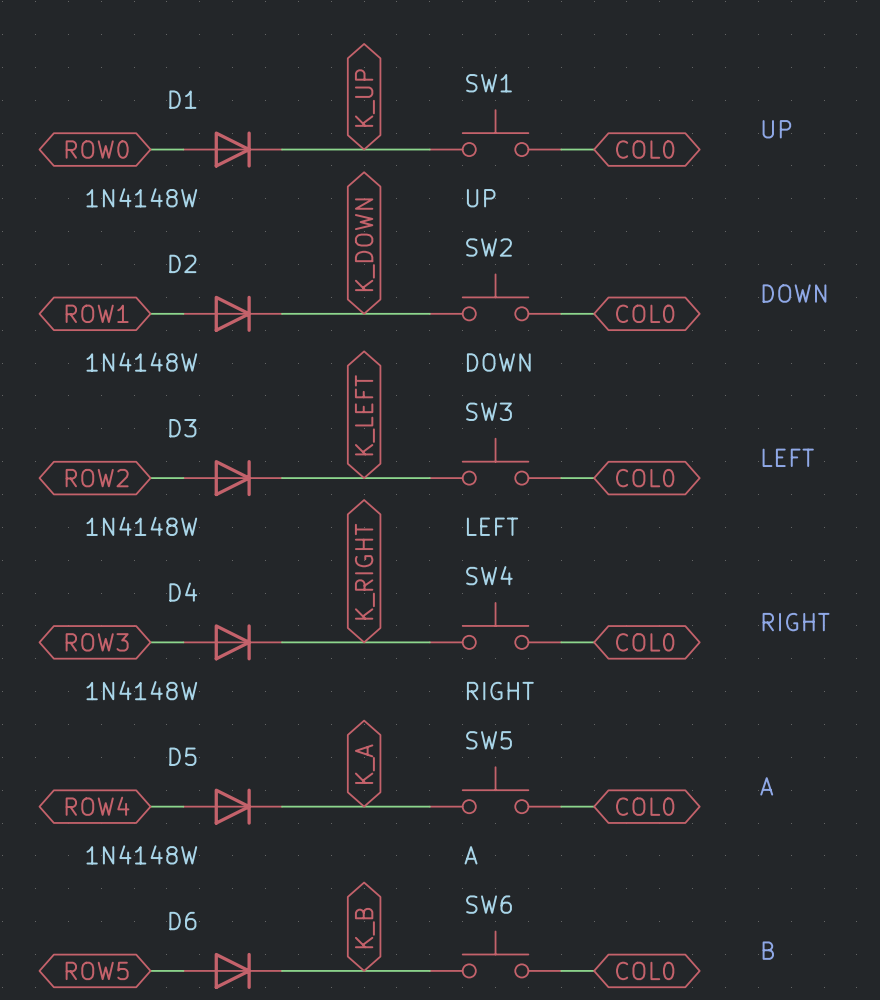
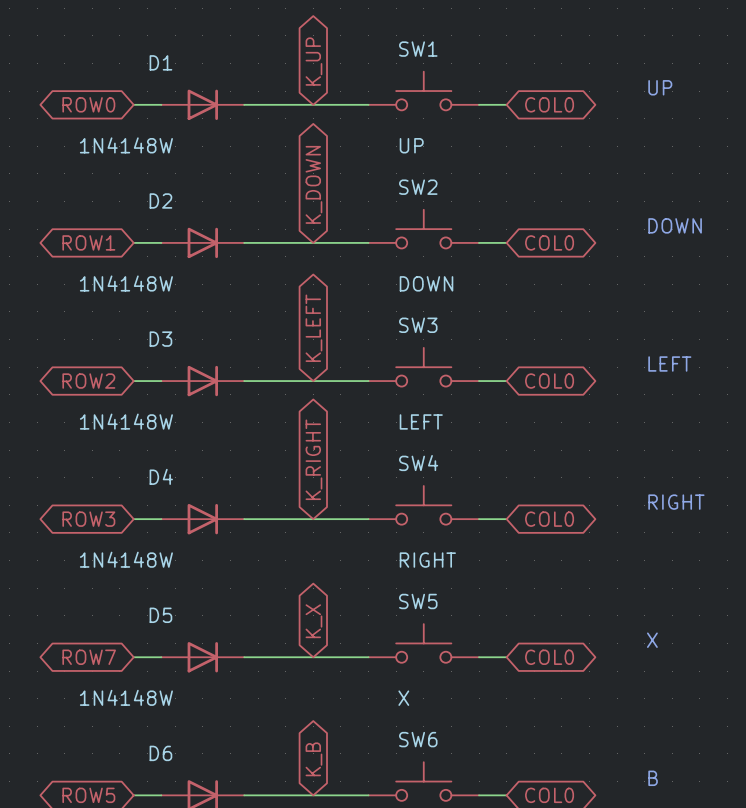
global label: K_A (364, 764) -> K_X (313, 621)
text: A (766, 786) -> X (652, 640)
global label: ROW4 (97, 806) -> ROW7 (89, 657)
SW5 value: A (471, 855) -> X (403, 698)

